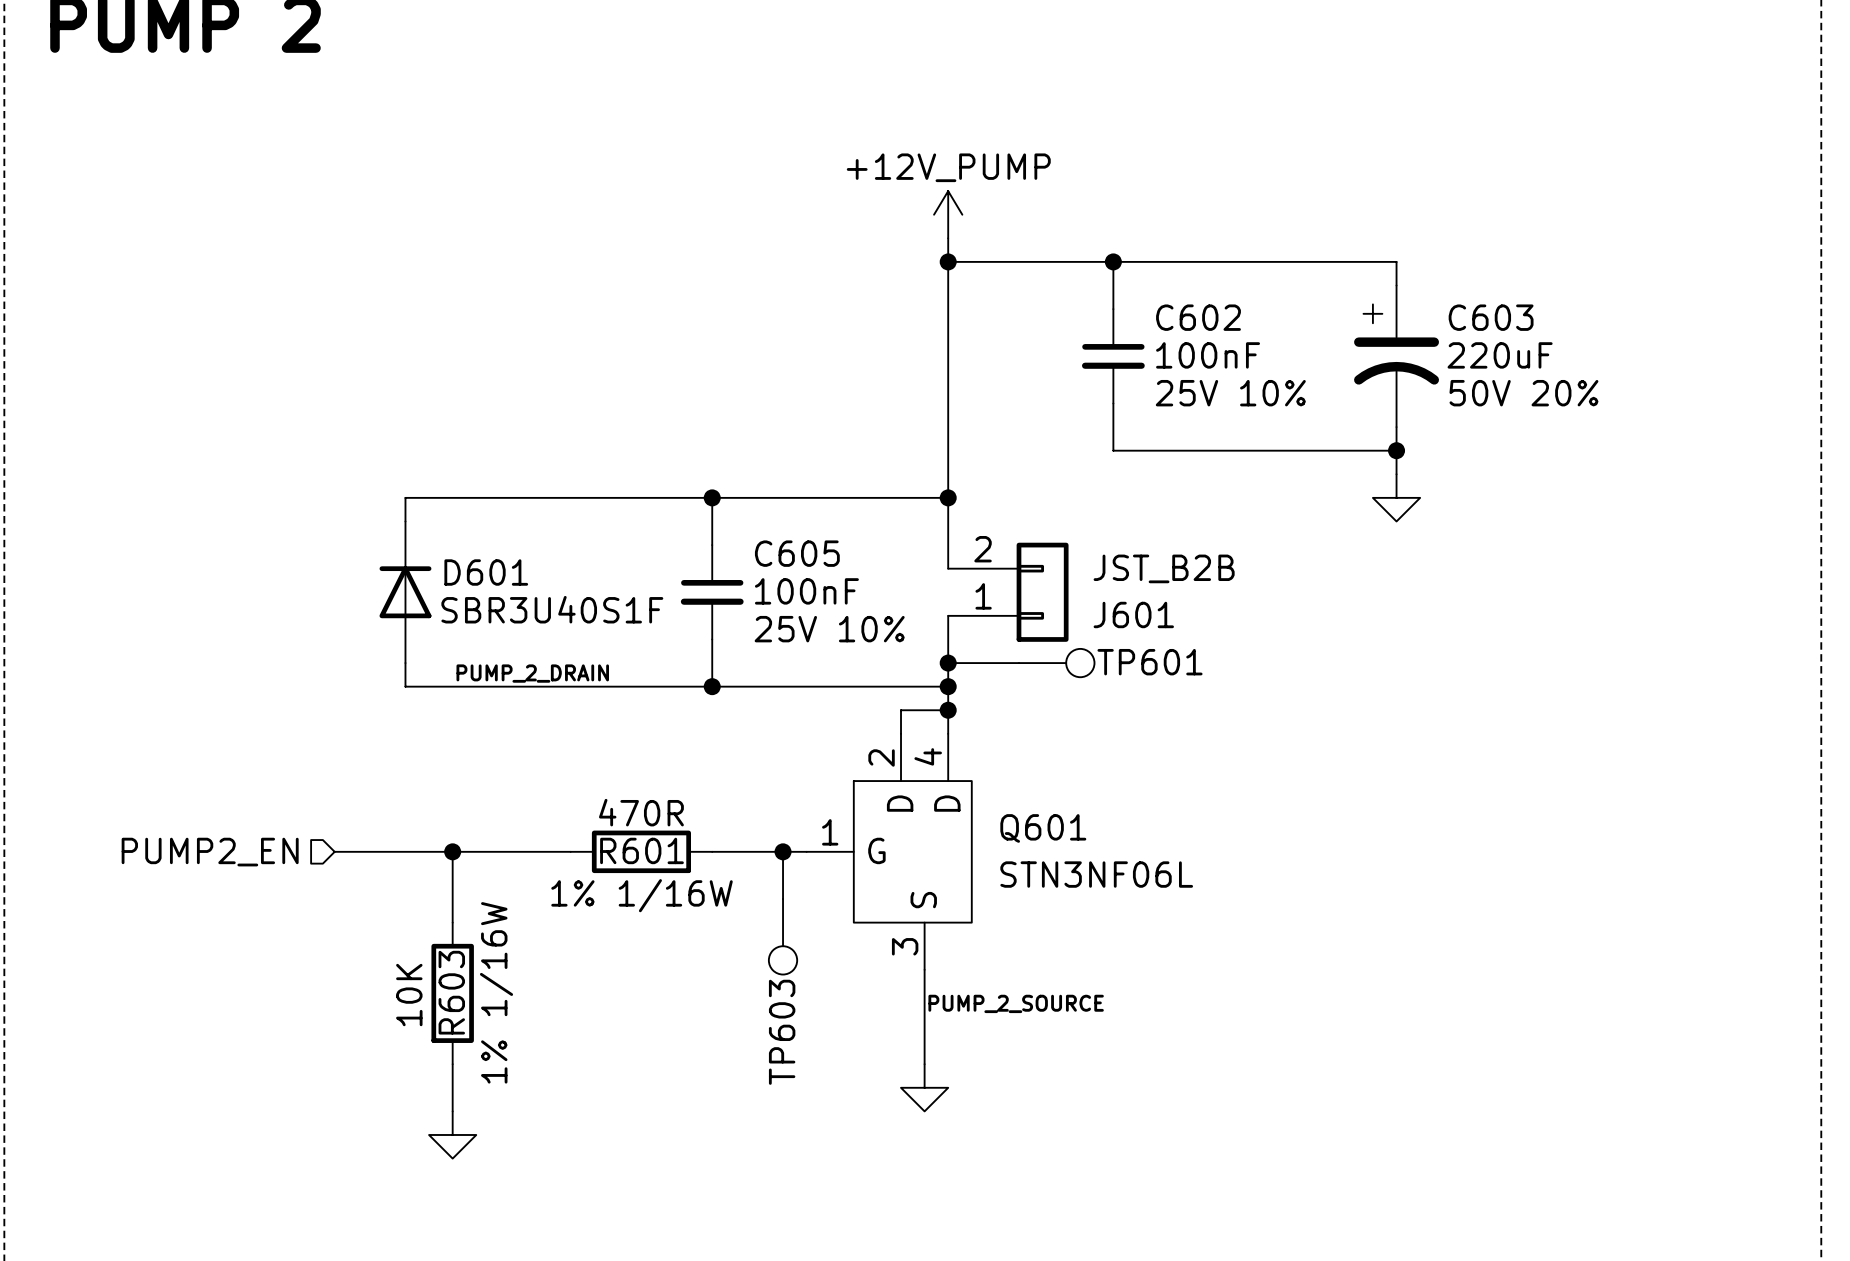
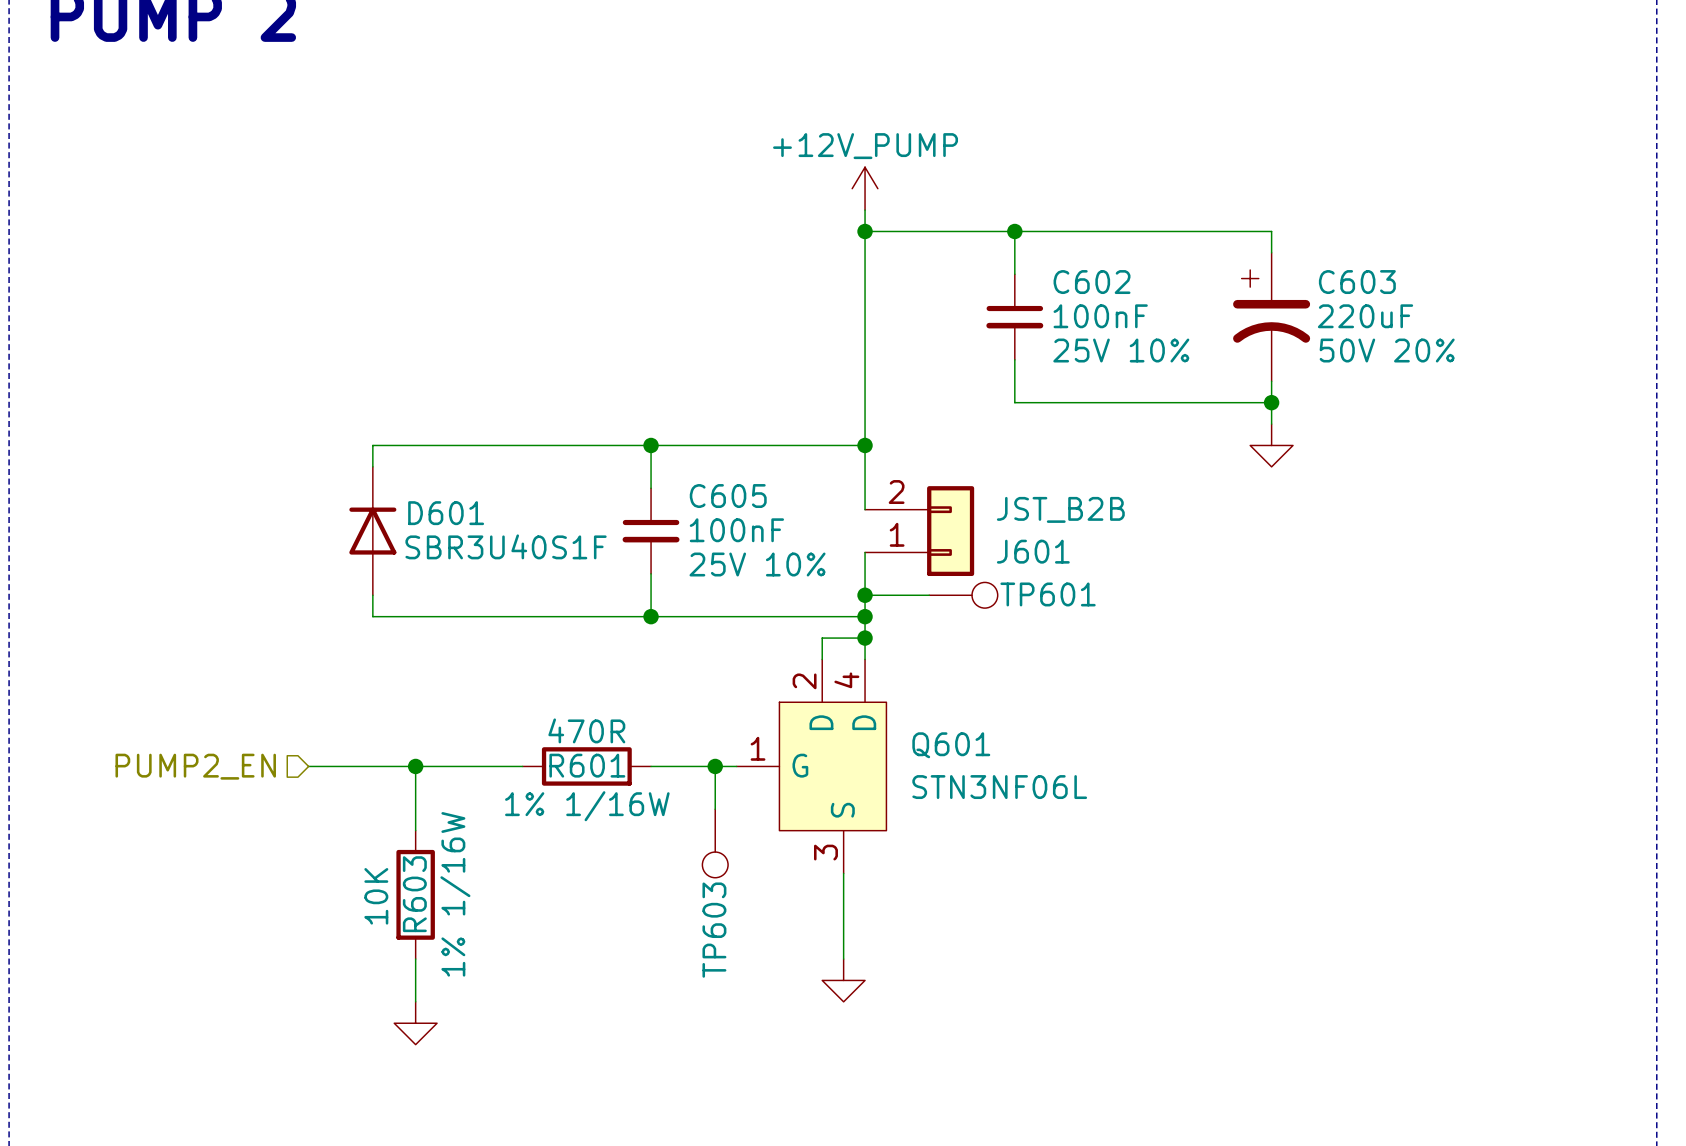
label: PUMP_2_DRAIN (532, 673) -> none
label: PUMP_2_SOURCE (1016, 1003) -> none

